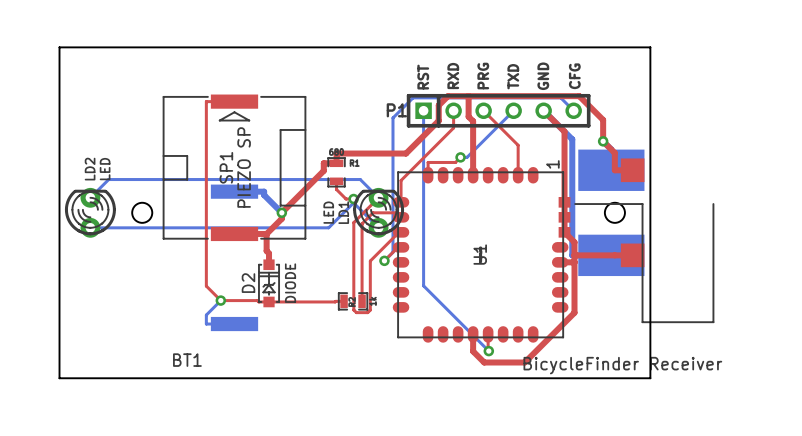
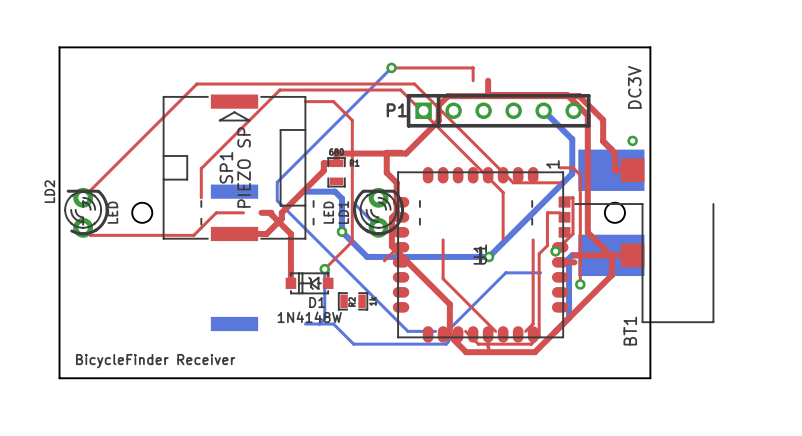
BT1 footprint: [58, 46, 652, 380] -> [58, 46, 652, 380]
bottom track: none -> (391, 67) (277, 182) (277, 200) (407, 331) (435, 331)
top track: none -> (391, 67) (473, 67) (473, 80)
via: none -> (391, 67)
text: RXD (453, 76) -> none
text: PRG (483, 76) -> none
text: TXD (513, 76) -> none
text: GND (543, 76) -> none
text: CFG (574, 76) -> none
text: RST (423, 77) -> none
top track: none -> (488, 80) (488, 94) (567, 94) (587, 115) (587, 232) (611, 256) (611, 275) (534, 352) (466, 352) (449, 335) (449, 304) (391, 246) (391, 217) (396, 212) (396, 182) (386, 172) (386, 152) (401, 152)
top track: (468, 96) (468, 116) (473, 121) (473, 175) -> none
top track: (234, 101) (206, 101) (206, 286) (220, 300) (344, 301) -> none
top track: none -> (305, 101) (333, 101) (352, 120) (352, 241) (324, 269) (328, 272) (328, 283)
bottom track: (423, 110) (423, 285) (488, 351) -> none
top track: (453, 110) (453, 127) (401, 180) (401, 202) -> none
top track: (483, 110) (518, 145) (518, 175) -> none
bottom track: (513, 110) (467, 157) (460, 157) -> none
top track: (543, 110) (564, 131) (564, 232) (574, 242) (574, 312) (524, 362) (484, 362) (473, 351) (473, 334) -> none
bottom track: (573, 110) (560, 97) (413, 97) (392, 117) (392, 252) (384, 260) -> none
via position: (603, 141) -> (632, 140)
top track: (460, 157) (455, 162) (428, 162) (428, 175) -> none
via: (460, 157) -> none
top track: none -> (560, 167) (573, 167) (580, 175) (580, 284)
LD2 name position: LD2 (90, 169) -> LD2 (49, 191)
LD2 value position: LED (105, 169) -> LED (112, 212)
bottom track: (572, 173) (572, 255) -> (555, 331) (569, 317) (569, 258) (572, 255)
bottom track: none -> (572, 173) (489, 256) (367, 256) (341, 231) (341, 198) (335, 191) (305, 191)
top track: (336, 181) (336, 189) (346, 199) (353, 199) -> none
top track: none -> (560, 182) (513, 182) (414, 84) (196, 84) (83, 197)
LD2 footprint: [64, 187, 116, 238] -> [64, 187, 109, 238]
bottom track: (234, 191) (264, 191) (264, 195) (281, 212) -> none
bottom track: (90, 197) (108, 179) (360, 179) (378, 197) -> none
top track: none -> (201, 197) (201, 168) (279, 90) (400, 90) (503, 192) (503, 239)
top track: (378, 197) (353, 222) (353, 310) (356, 312) (367, 312) (370, 310) (370, 261) (401, 232) -> none
top track: none -> (560, 197) (573, 197) (573, 233) (555, 251)
bottom track: (353, 199) (353, 202) (328, 227) (90, 227) -> none
via: (353, 199) -> none
top track: none -> (243, 212) (216, 212) (193, 235) (90, 235) (83, 227)
top track: none -> (261, 212) (271, 212) (290, 233) (290, 283)
via: (281, 212) -> none
top track: none -> (560, 212) (547, 212) (547, 245) (539, 253) (539, 336) (531, 344) (478, 344) (465, 331)
top track: (401, 217) (396, 212) (373, 212) (362, 223) (362, 301) -> none
via: none -> (341, 231)
top track: (266, 233) (269, 264) -> none
top track: none -> (443, 239) (443, 278) (495, 331)
top track: none -> (533, 239) (533, 323) (525, 331)
via: none -> (555, 251)
via: none -> (489, 256)
via: (384, 260) -> none
bottom track: none -> (324, 269) (324, 318) (319, 324)
via: none -> (324, 269)
bottom track: none -> (540, 272) (505, 272) (448, 330) (448, 341) (446, 344) (353, 344) (333, 324) (305, 324)
D2: DIODE (269, 283) -> none
D1: none -> 1N4148W (309, 283)
via: none -> (580, 284)
bottom track: (220, 300) (206, 315) (206, 324) (234, 324) -> none
via: (220, 300) -> none
via: (488, 351) -> none
BT1 name position: BT1 (187, 360) -> BT1 (630, 331)
text: none -> BicycleFinder Receiver (155, 361)
BT1 value: BicycleFinder Receiver (622, 365) -> DC3V (634, 87)

